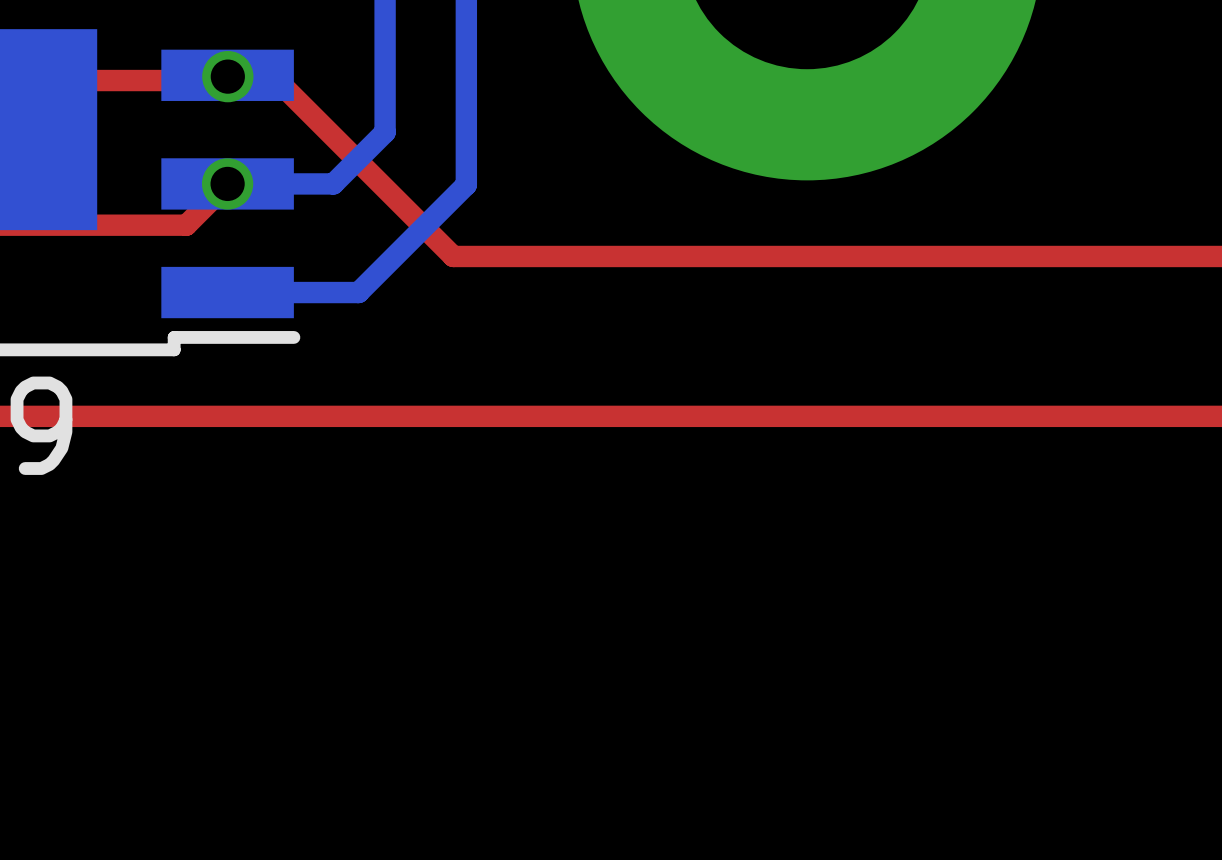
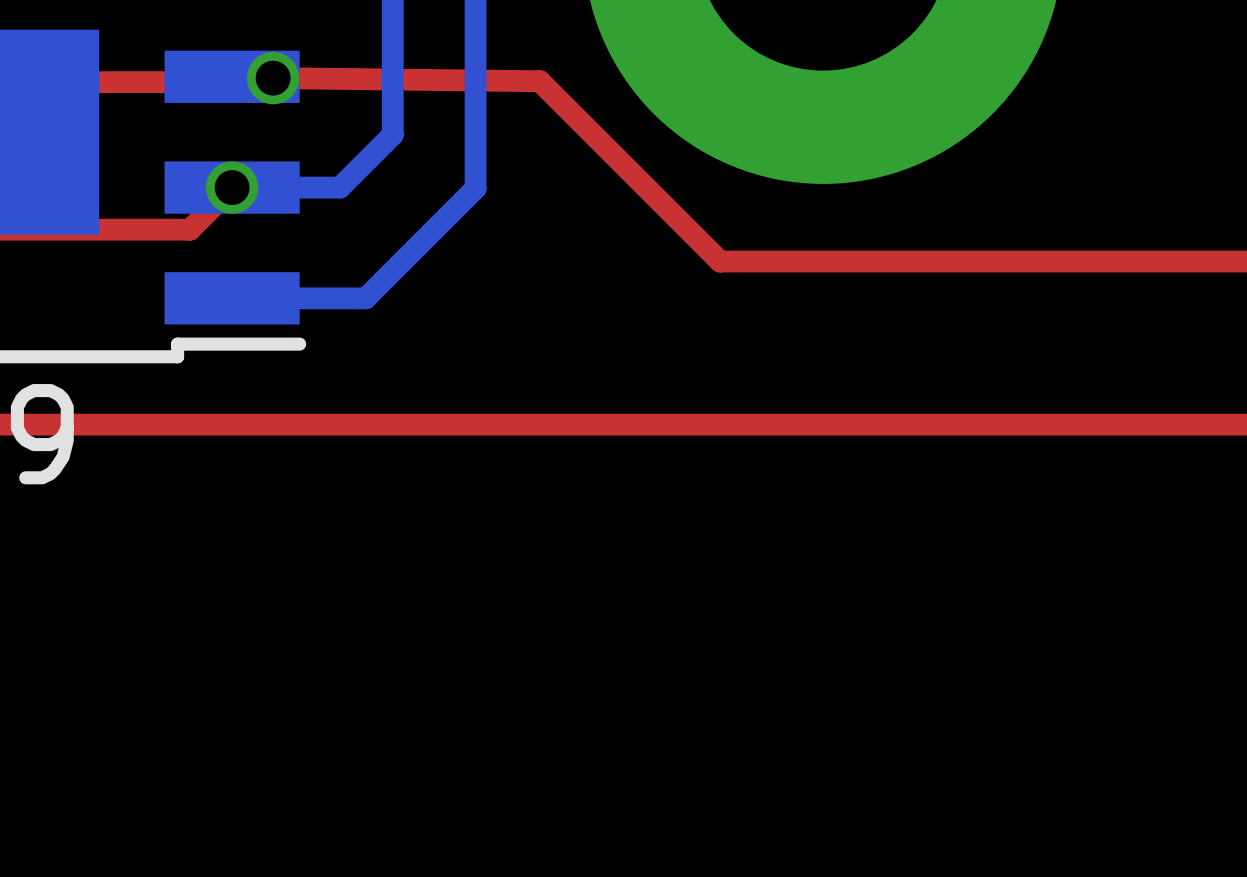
via position: (227, 76) -> (273, 78)
top track: (223, 80) (227, 76) (273, 77) (453, 256) (706, 256) -> (228, 82) (269, 82) (273, 78) (539, 81) (720, 261)

